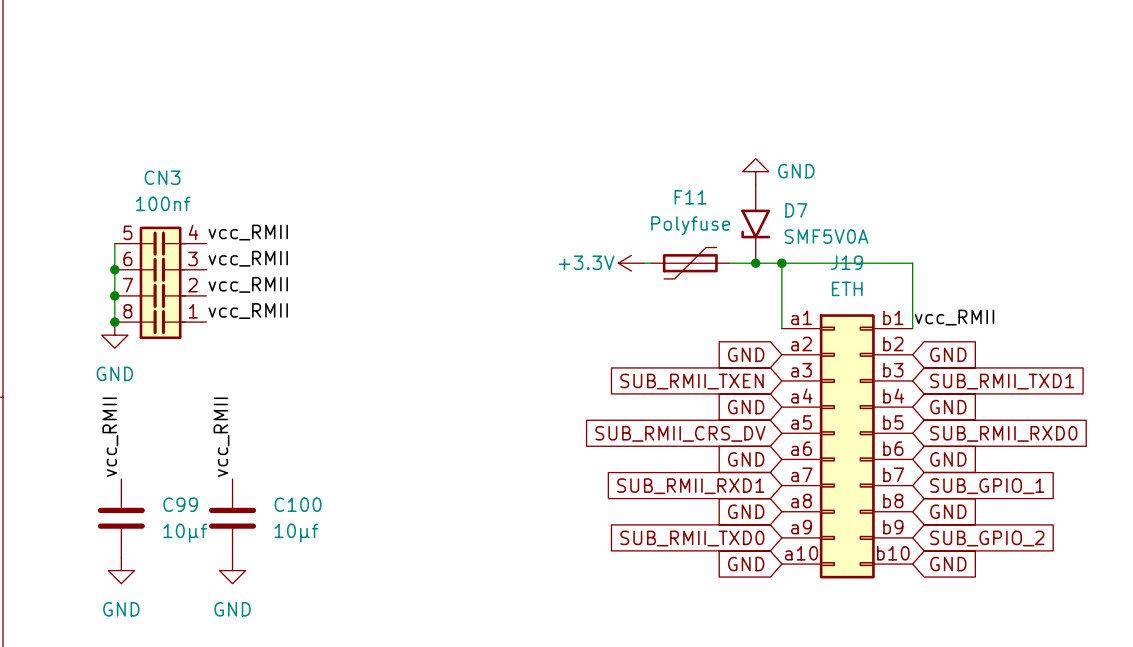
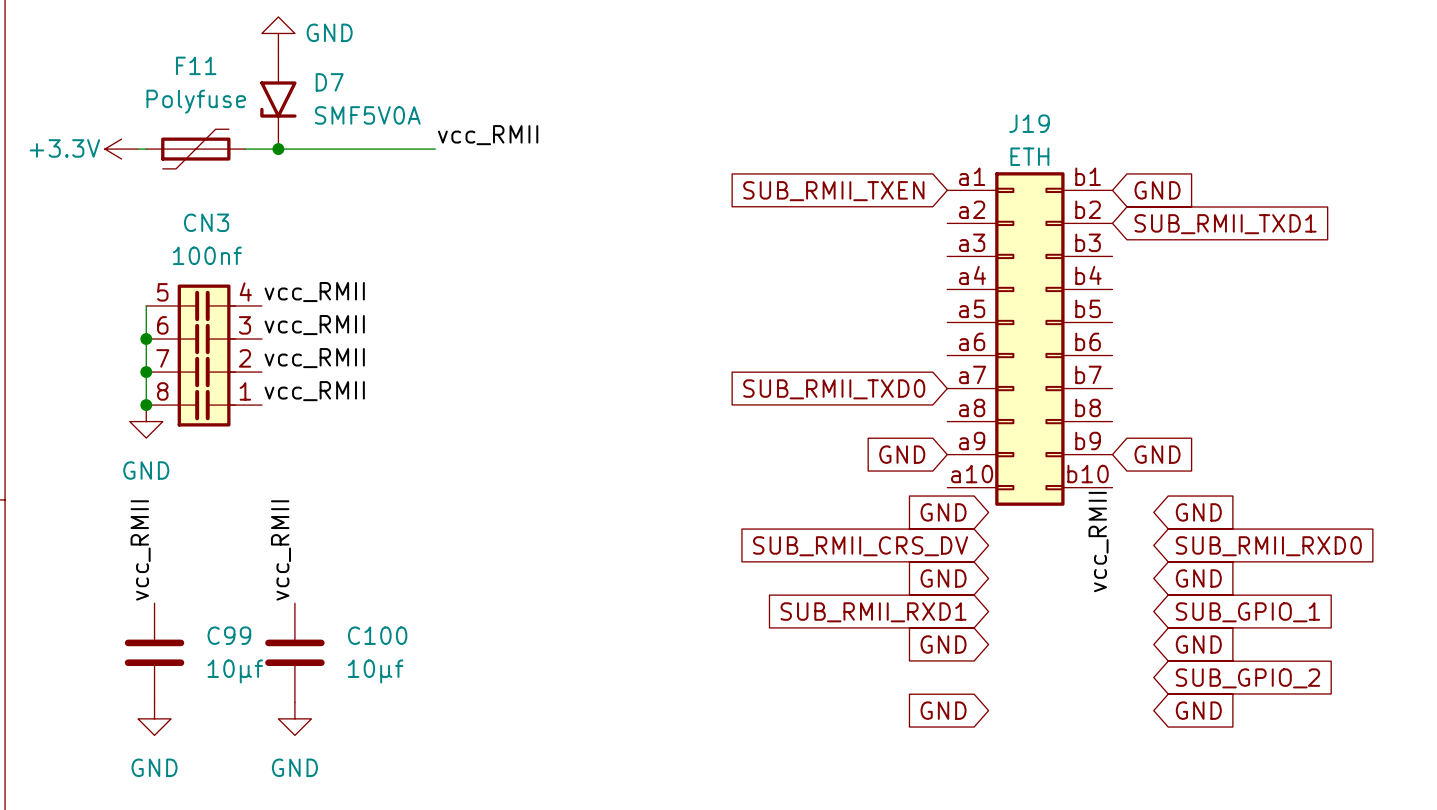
power symbol: none -> GND (278, 33)
label: none -> vcc_RMII (488, 135)
power symbol: none -> +3.3V (121, 149)
wire: none -> (138, 149) (146, 149)
wire: none -> (245, 149) (435, 149)
junction: none -> (278, 149)
global label: none -> GND (1157, 190)
power symbol: GND (755, 171) -> none
D7 position: (755, 223) -> (278, 99)
J19 name position: J19 (846, 262) -> J19 (1029, 123)
power symbol: +3.3V (631, 263) -> none
wire: (644, 263) (651, 263) -> none
F11 position: (690, 263) -> (195, 149)
wire: (729, 263) (912, 263) (912, 328) -> none
junction: (755, 263) -> none
wire: (781, 263) (781, 328) -> none
junction: (781, 263) -> none
J19 value position: ETH (847, 288) -> ETH (1029, 156)
label rotation: 0° (954, 317) -> 90° counterclockwise (1098, 542)
label position: vcc_RMII (954, 317) -> vcc_RMII (1098, 542)
global label position: GND (746, 354) -> GND (902, 454)
global label position: GND (948, 354) -> GND (1157, 454)
global label position: SUB_RMII_TXEN (692, 381) -> SUB_RMII_TXEN (833, 191)
global label position: SUB_RMII_TXD1 (1002, 381) -> SUB_RMII_TXD1 (1225, 224)
J19 position: (847, 446) -> (1029, 339)
global label position: SUB_RMII_TXD0 (692, 538) -> SUB_RMII_TXD0 (834, 389)

